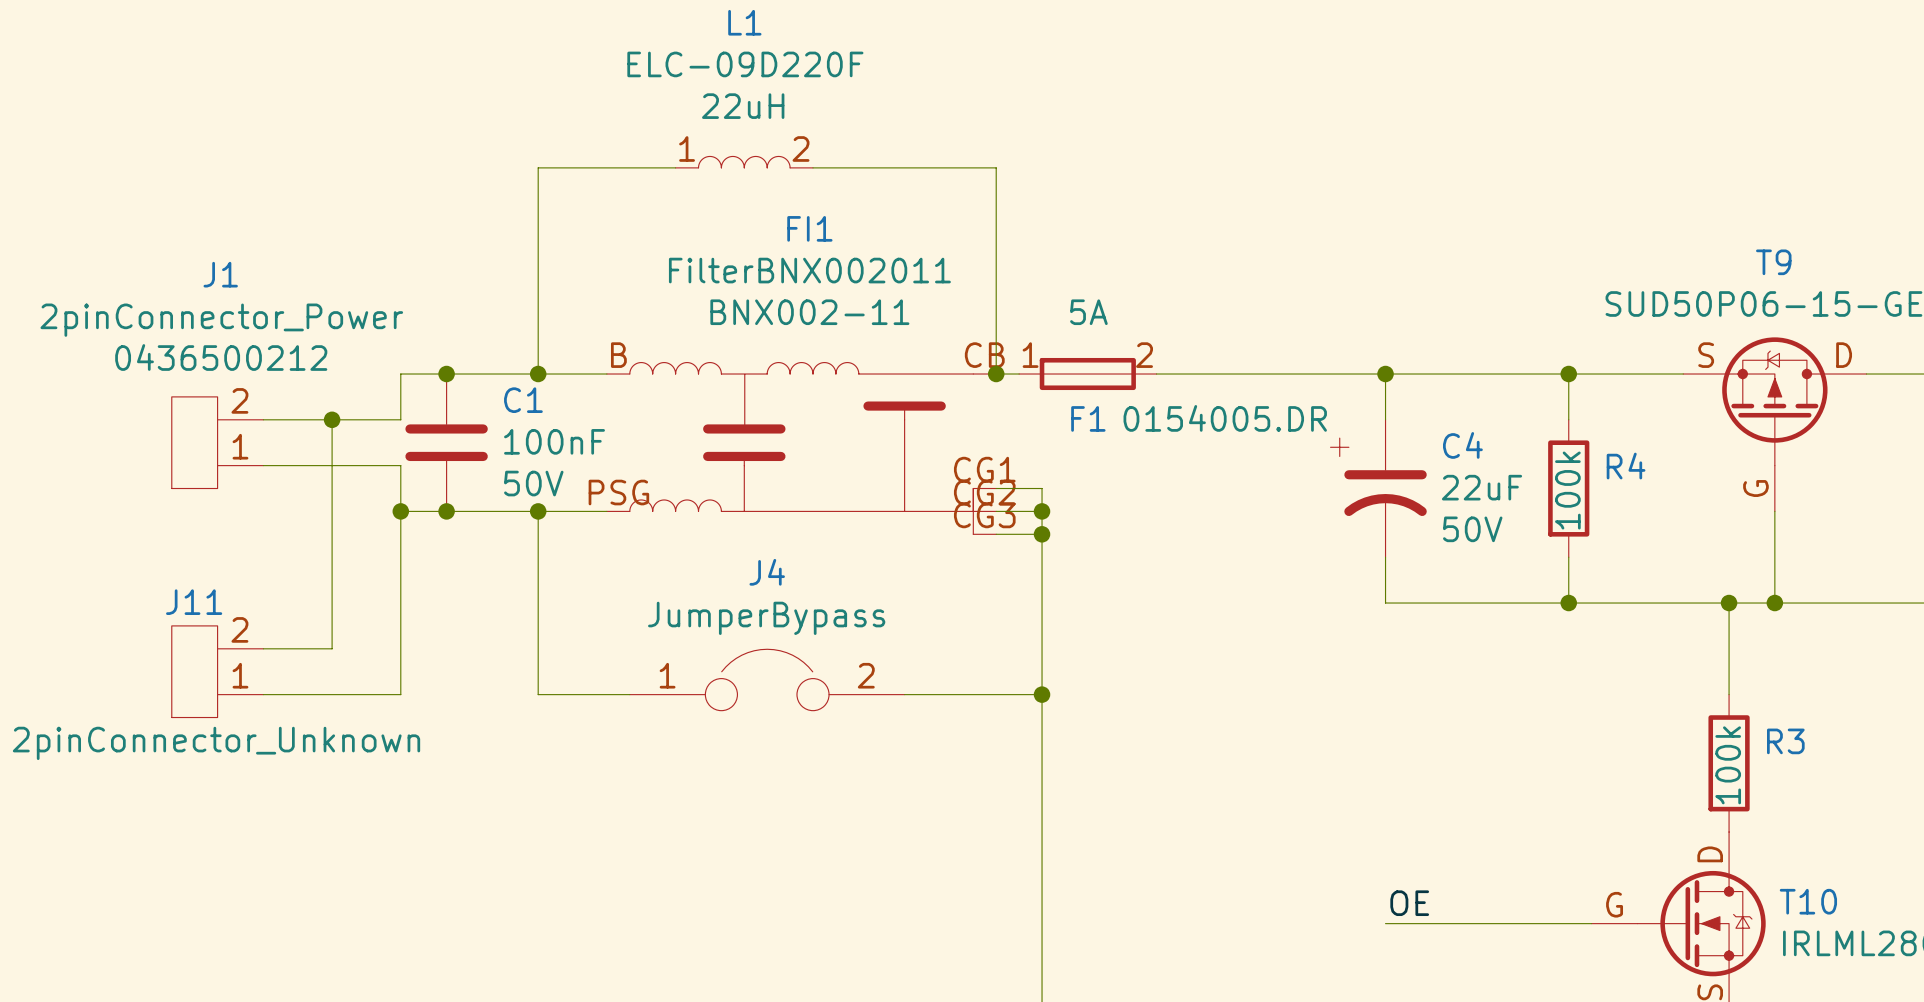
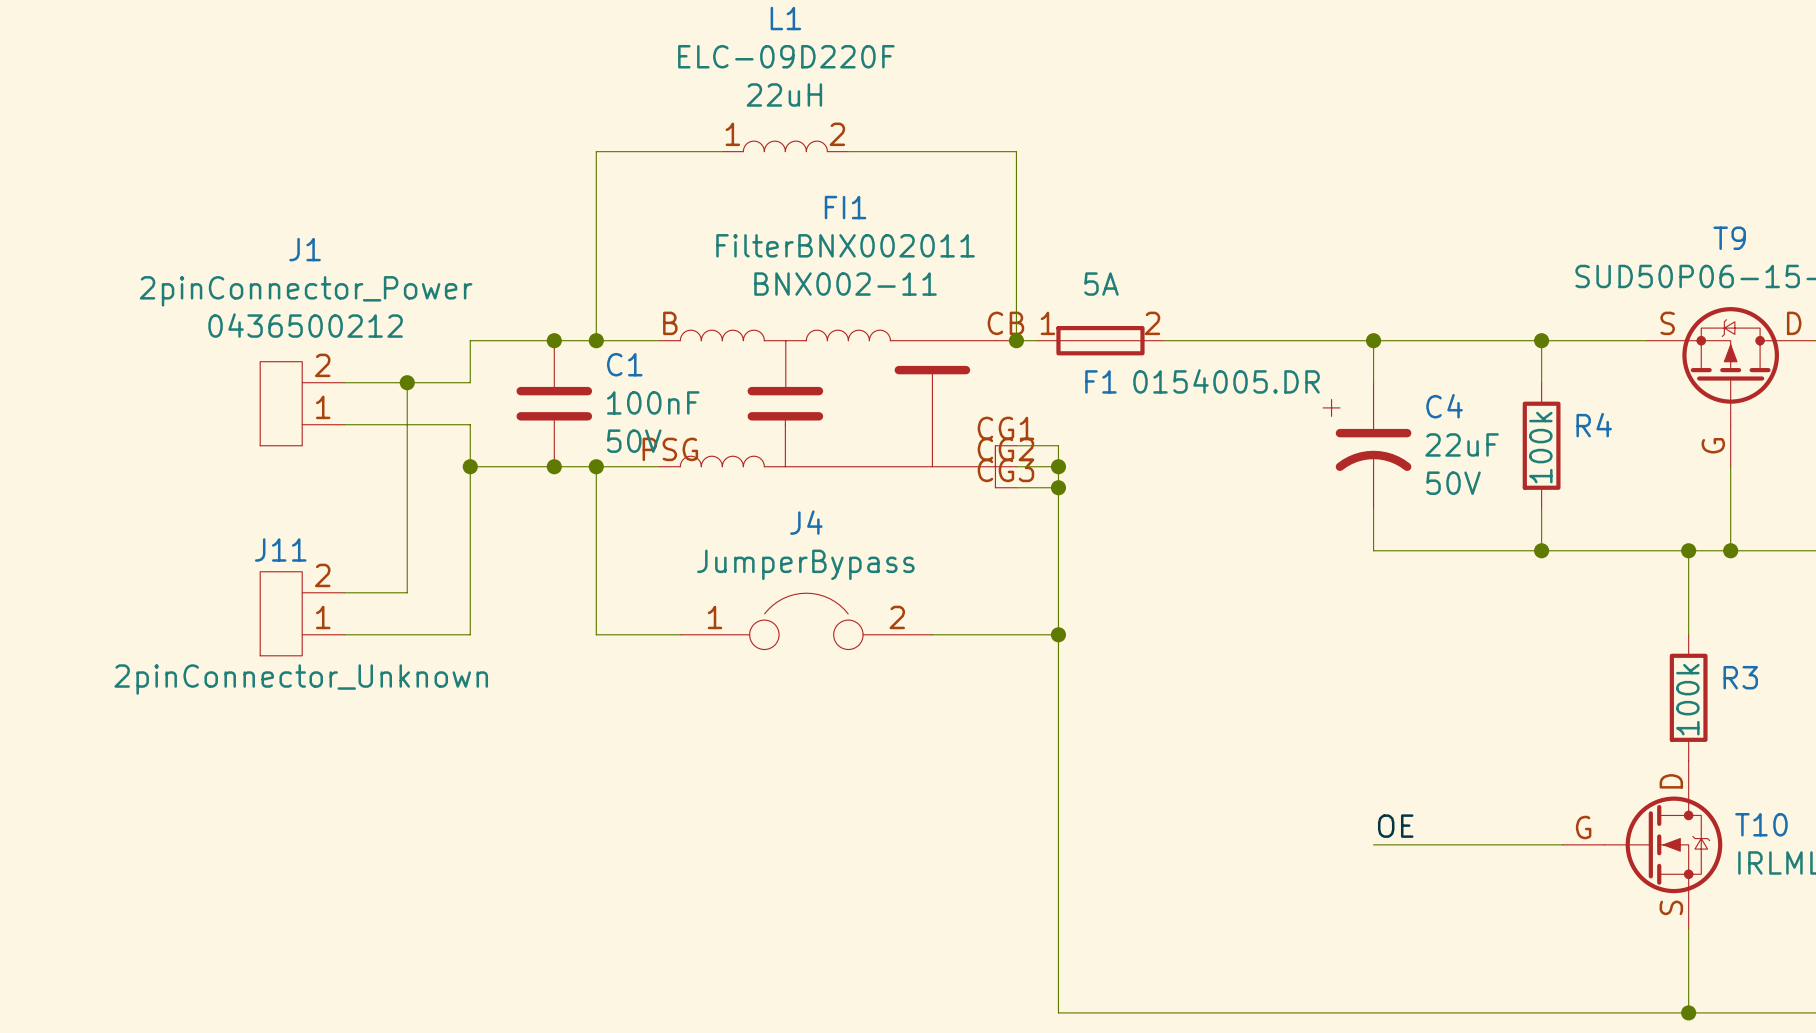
junction position: (446, 374) -> (554, 340)
C1 position: (446, 442) -> (554, 403)
junction position: (446, 511) -> (554, 466)

